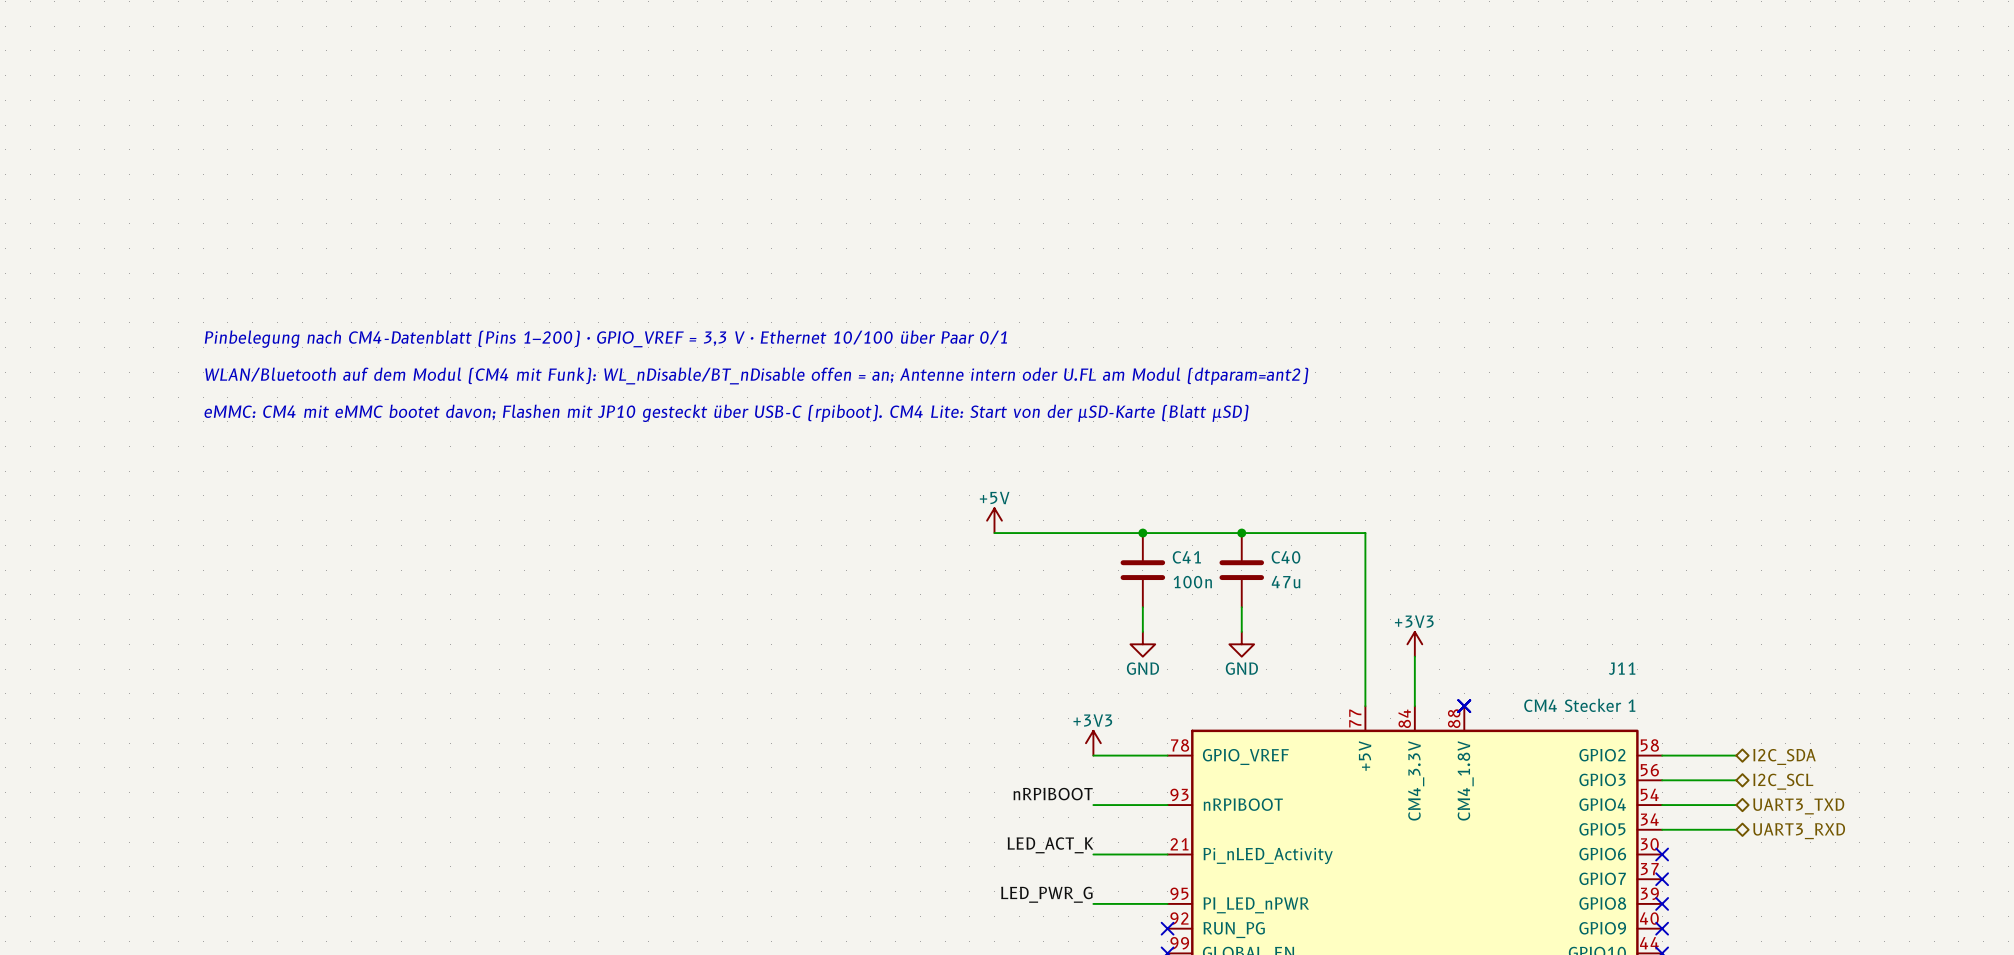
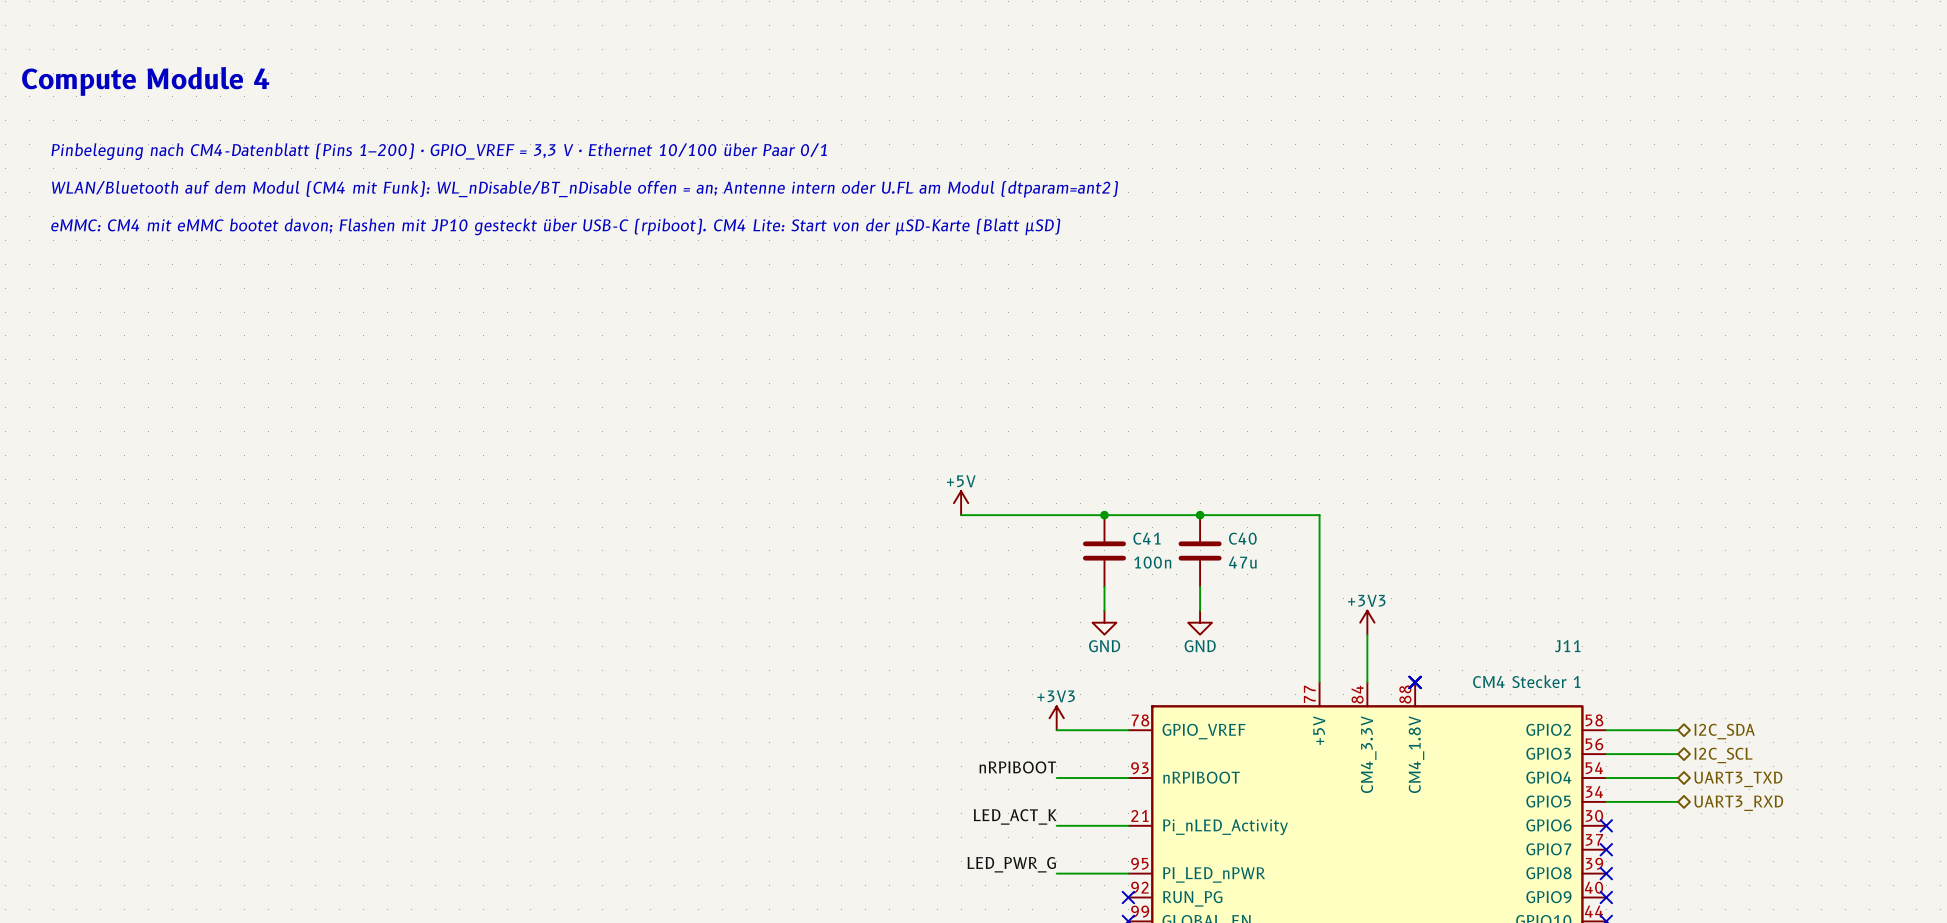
text: none -> Compute Module 4 (145, 81)
text position: Pinbelegung nach CM4-Datenblatt (Pins 1–200) · GPIO_VREF = 3,3 V · Ethernet 10/100 über Paar 0/1 (605, 339) -> Pinbelegung nach CM4-Datenblatt (Pins 1–200) · GPIO_VREF = 3,3 V · Ethernet 10/100 über Paar 0/1 (439, 151)
text position: WLAN/Bluetooth auf dem Modul (CM4 mit Funk): WL_nDisable/BT_nDisable offen = an; Antenne intern oder U.FL am Modul (dtparam=ant2) (756, 376) -> WLAN/Bluetooth auf dem Modul (CM4 mit Funk): WL_nDisable/BT_nDisable offen = an; Antenne intern oder U.FL am Modul (dtparam=ant2) (584, 189)
text position: eMMC: CM4 mit eMMC bootet davon; Flashen mit JP10 gesteckt über USB-C (rpiboot). CM4 Lite: Start von der µSD-Karte (Blatt µSD) (726, 413) -> eMMC: CM4 mit eMMC bootet davon; Flashen mit JP10 gesteckt über USB-C (rpiboot). CM4 Lite: Start von der µSD-Karte (Blatt µSD) (555, 226)

